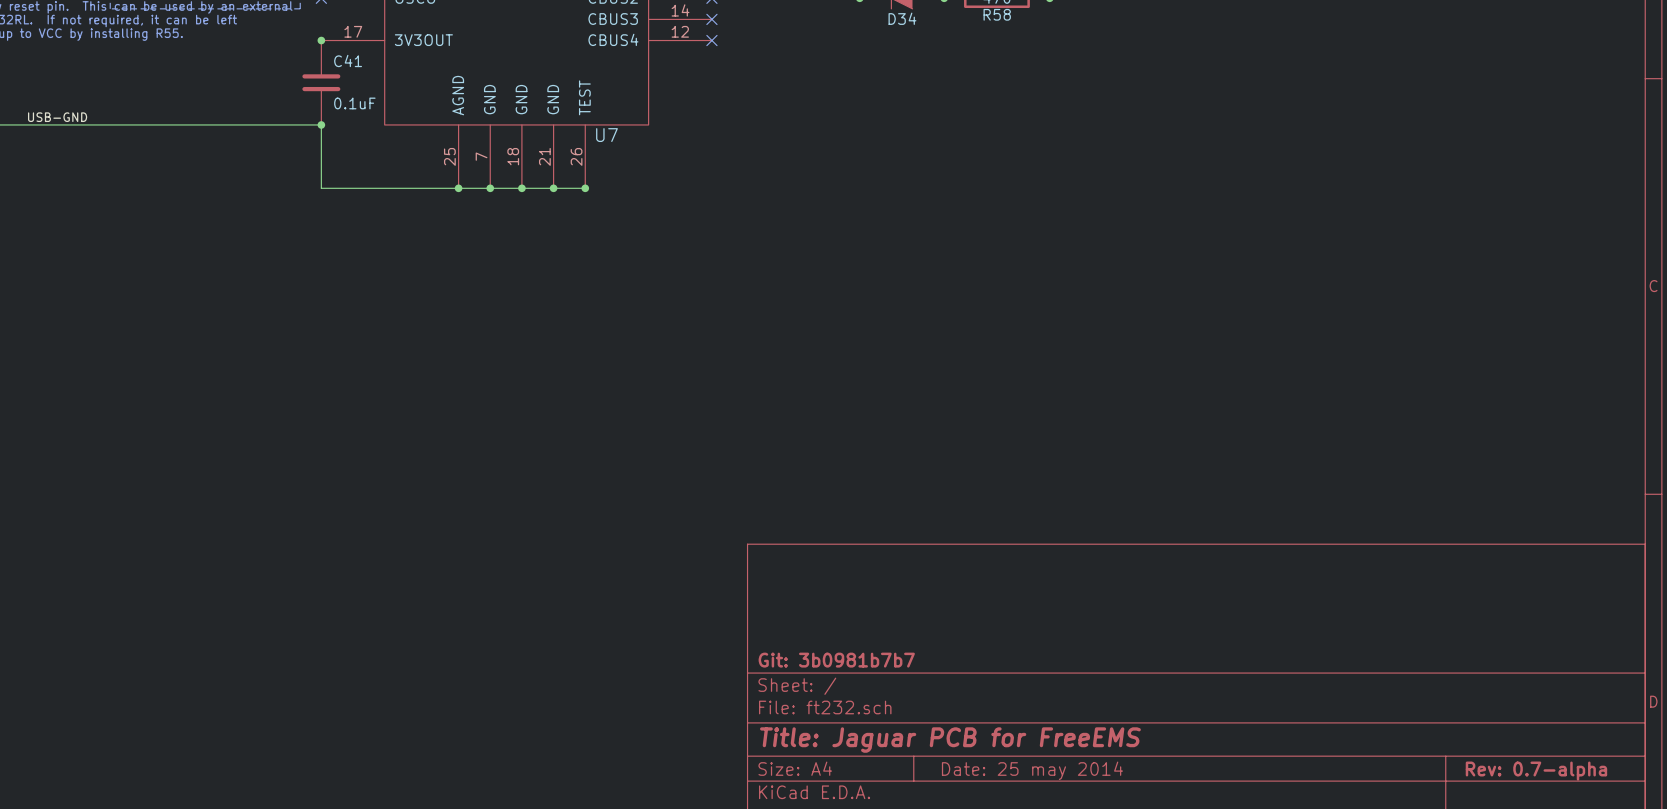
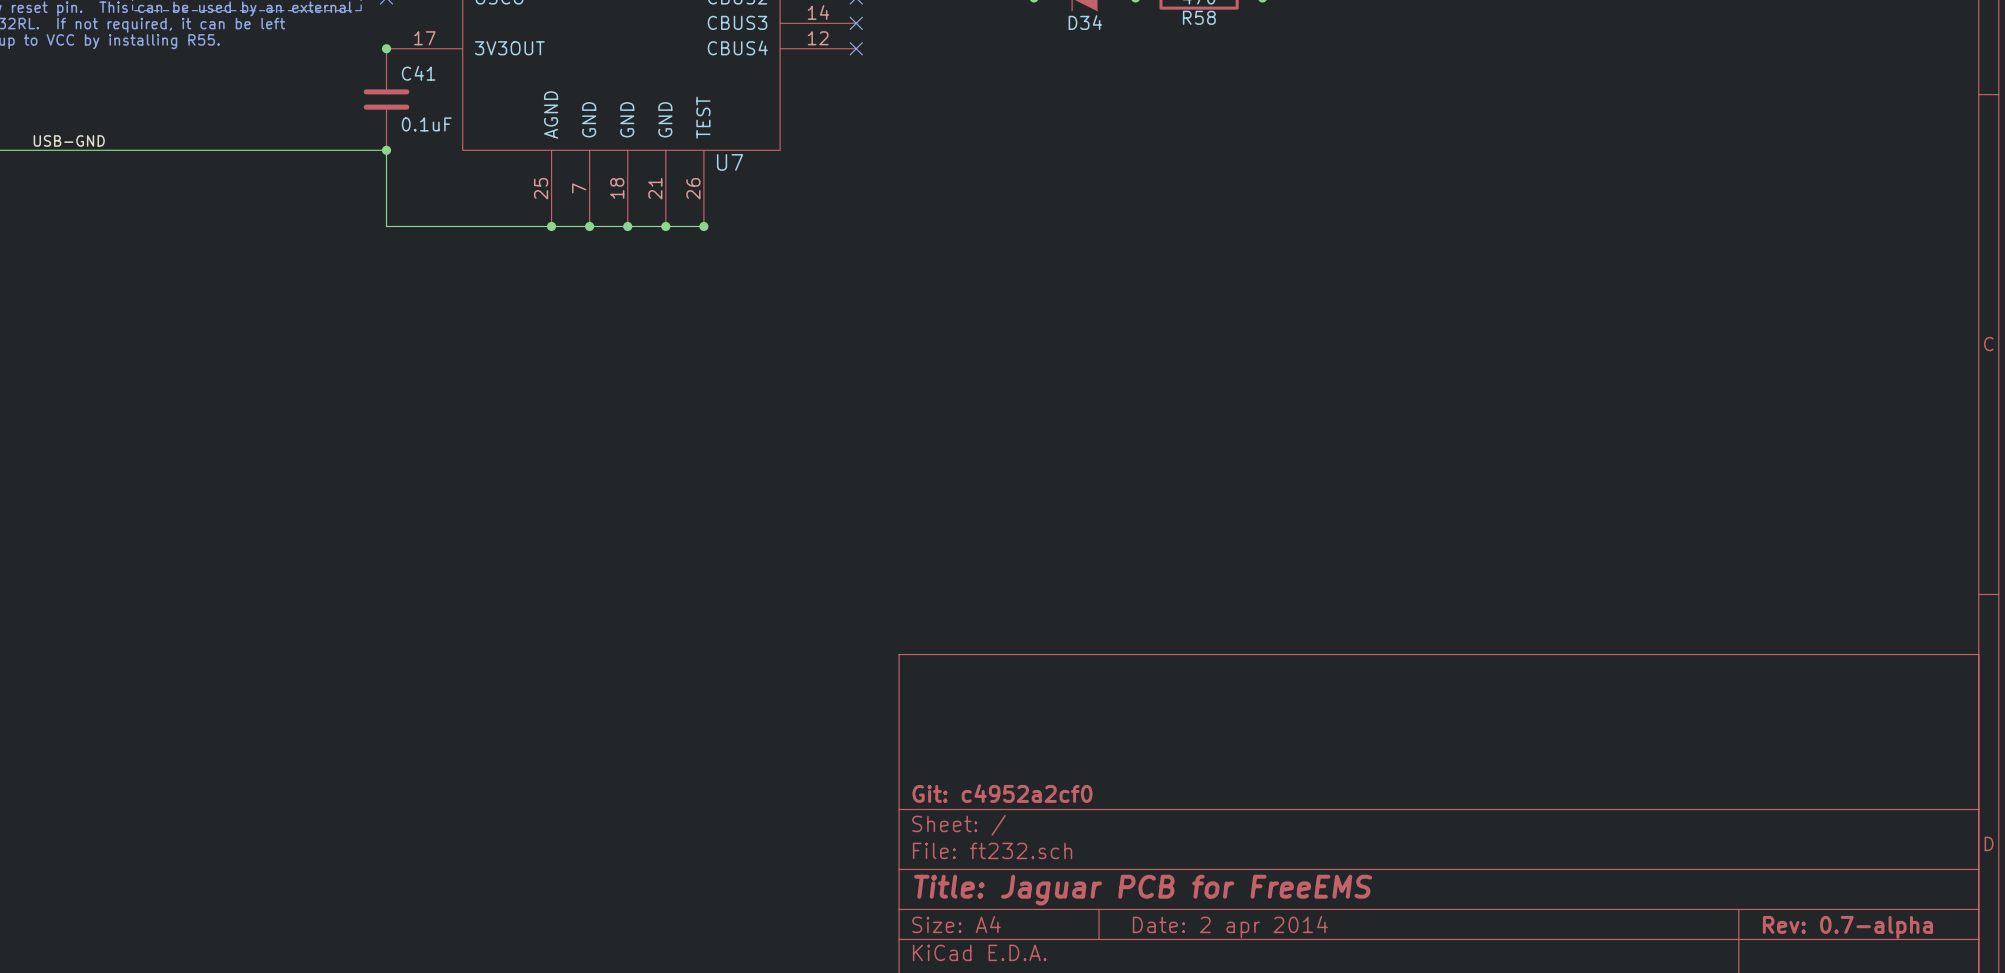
title block: Git: 3b0981b7b7 (836, 660) -> Git: c4952a2cf0 (1002, 793)
title block: Date: 25 may 2014 (1032, 770) -> Date: 2 apr 2014 (1230, 927)

